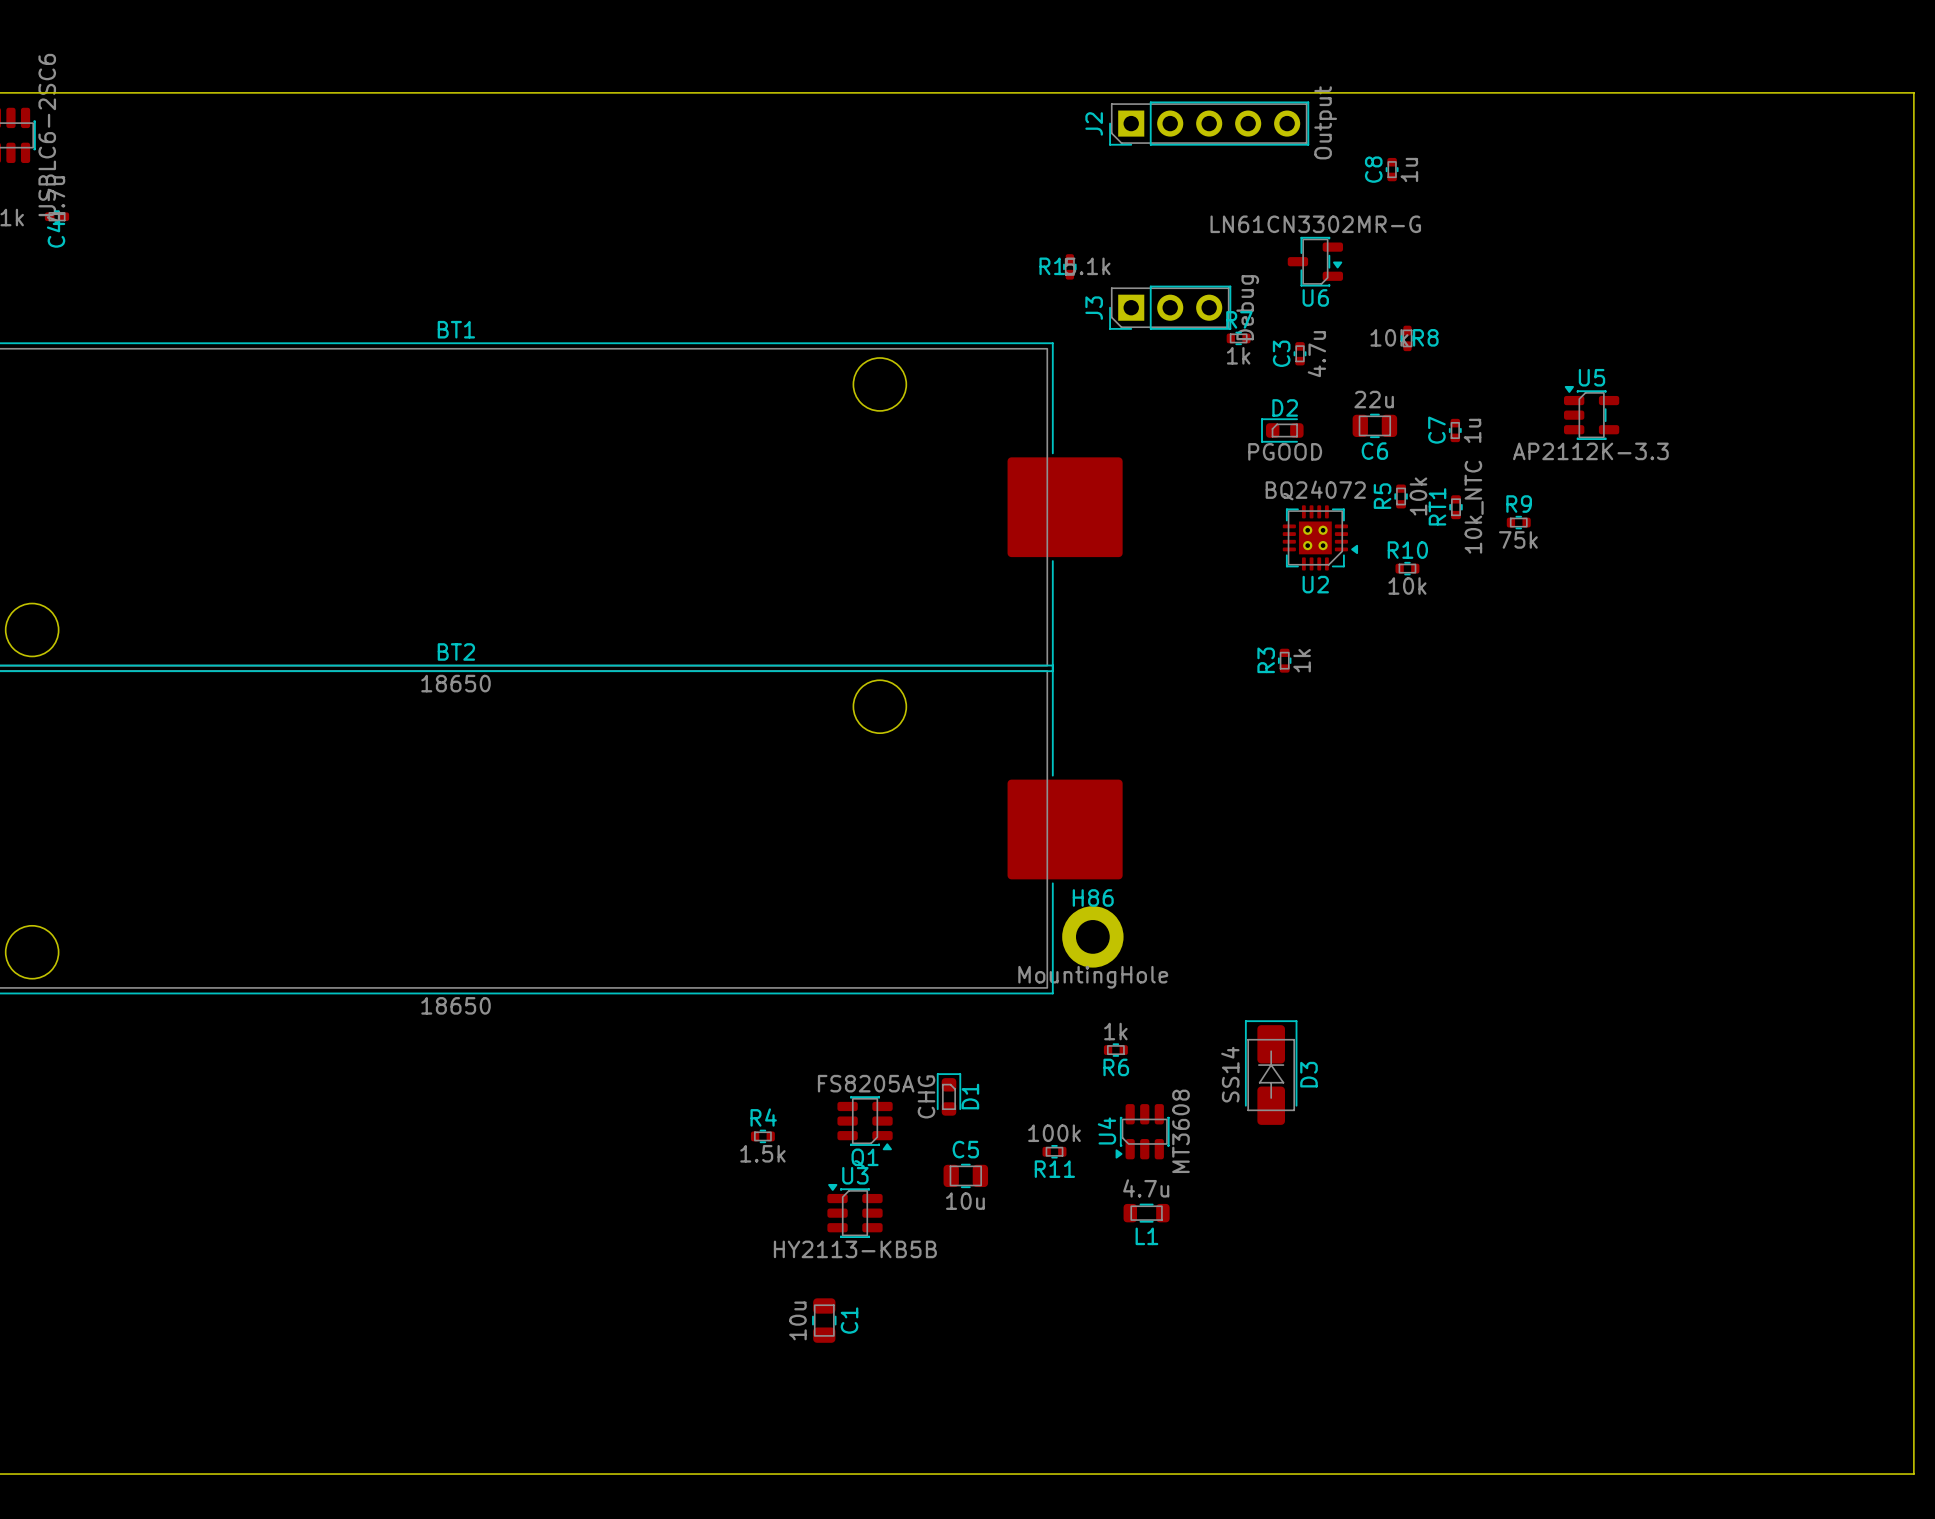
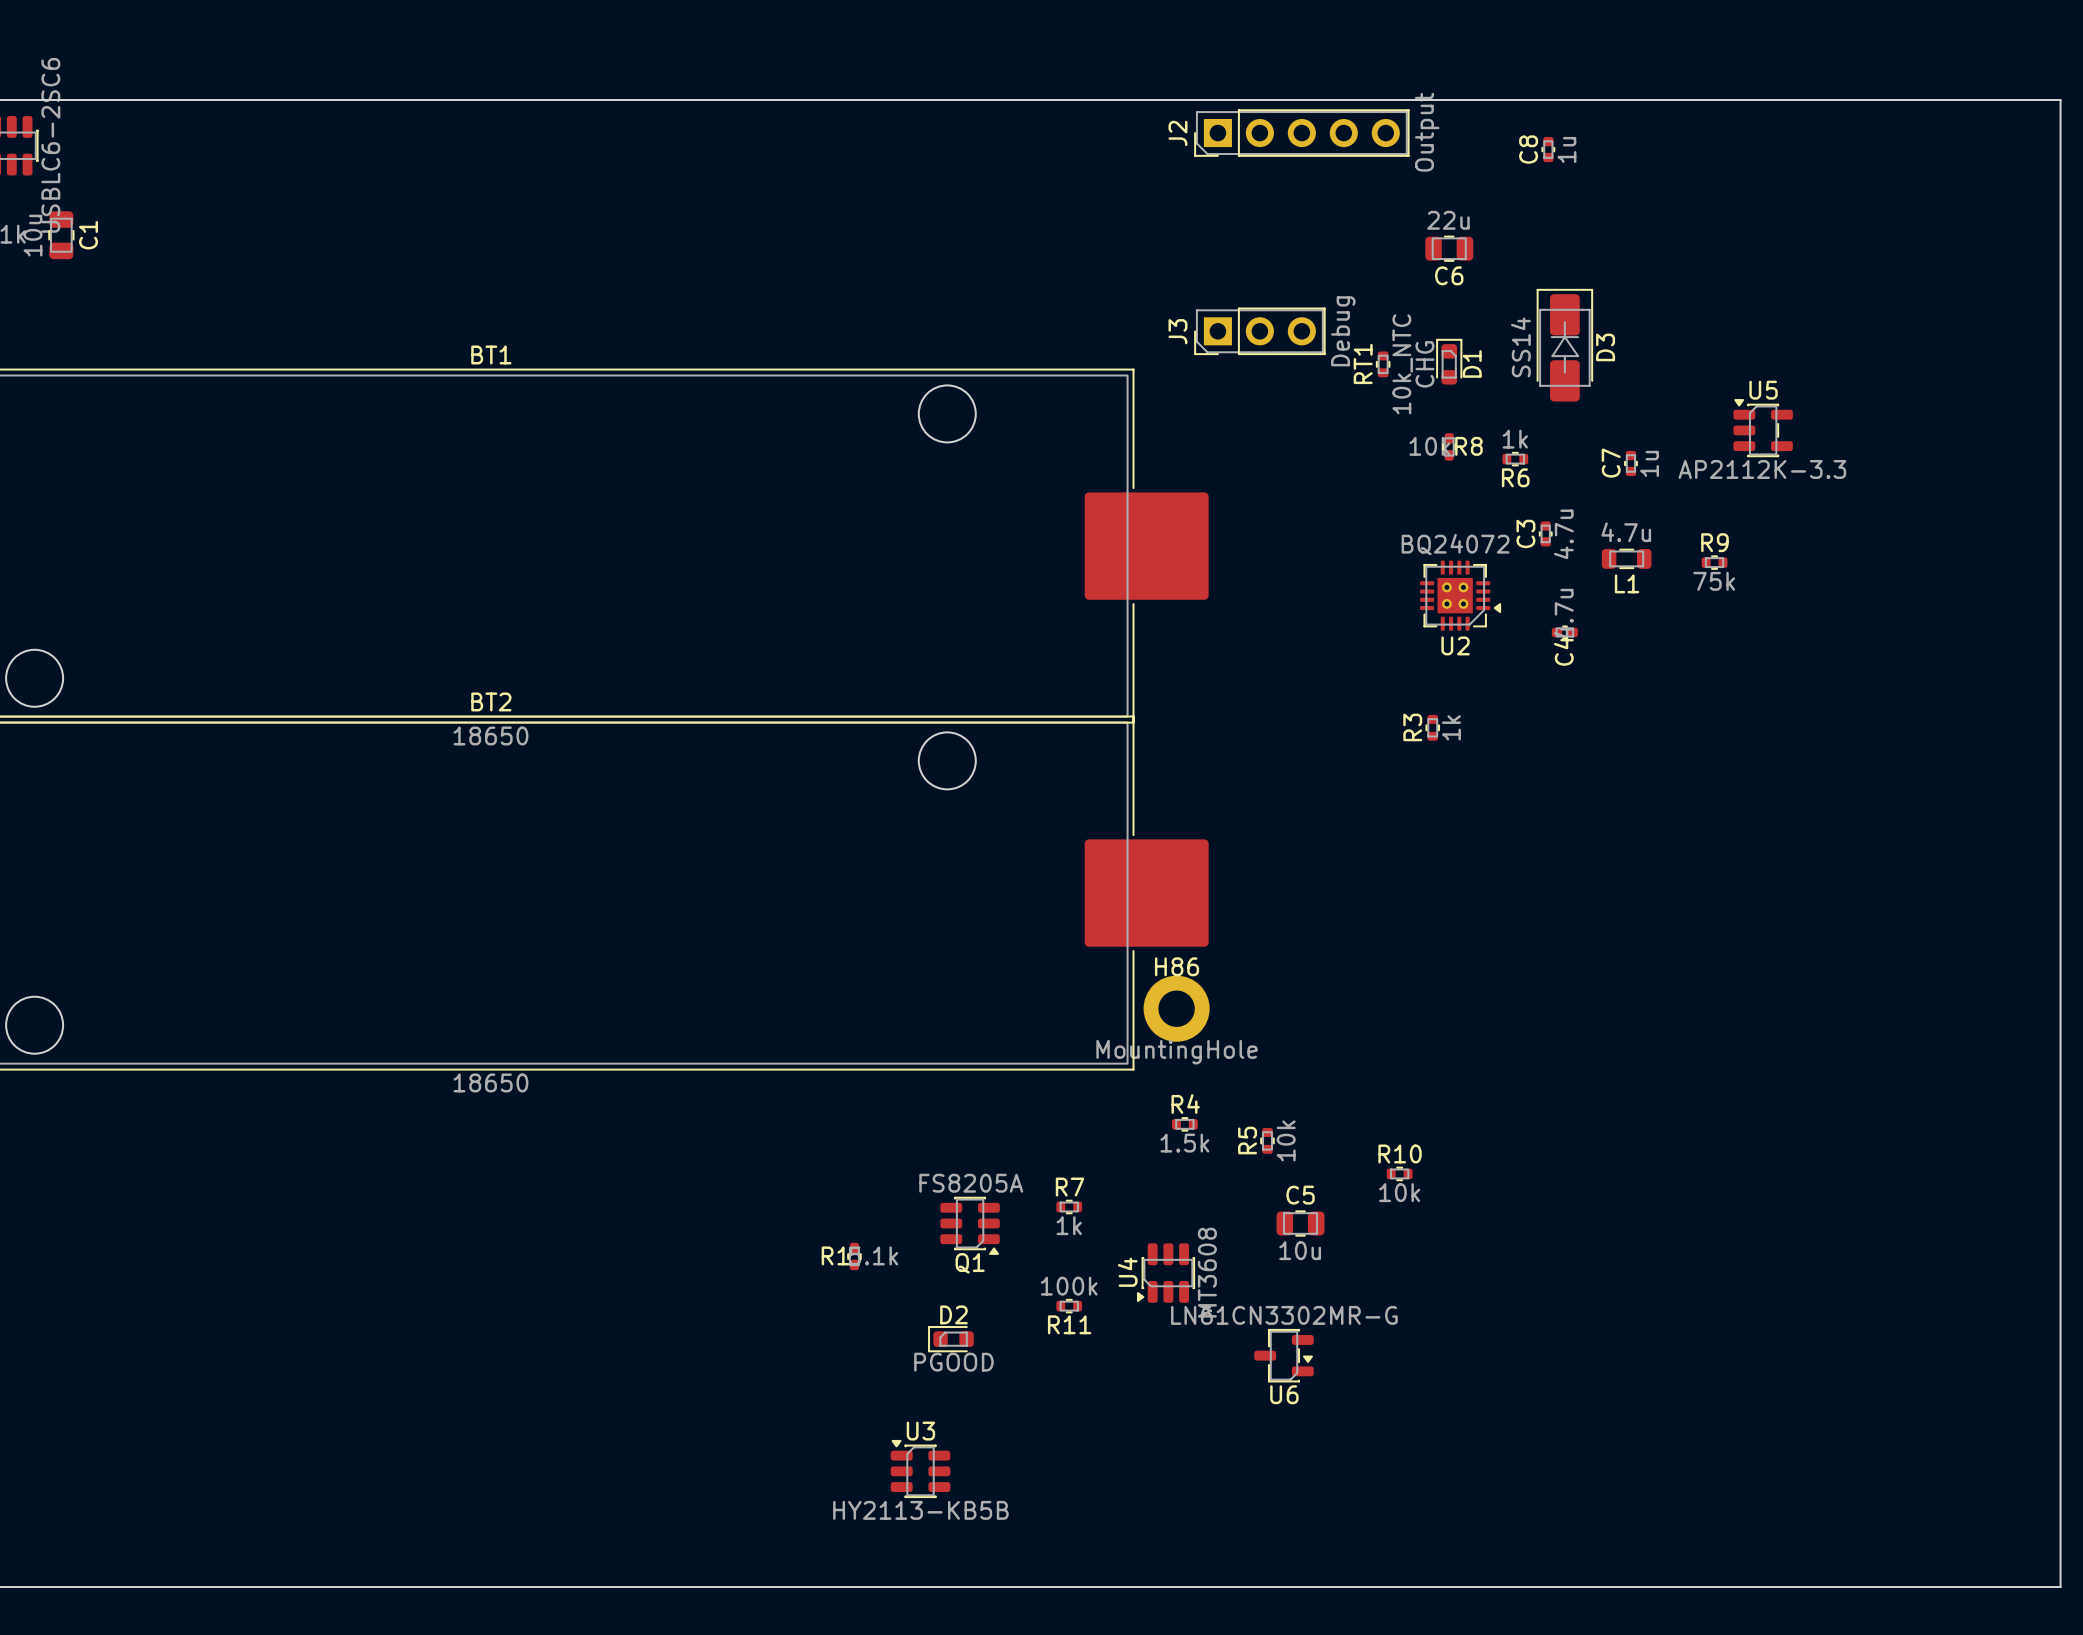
C8 position: (1392, 169) -> (1548, 149)
C4 position: (57, 216) -> (1564, 632)
U6 position: (1315, 261) -> (1284, 1355)
R1 position: (1069, 266) -> (854, 1256)
R7 position: (1238, 338) -> (1069, 1206)
R8 position: (1407, 338) -> (1449, 446)
C3 position: (1300, 353) -> (1545, 533)
U5 position: (1591, 412) -> (1763, 428)
C6 position: (1374, 425) -> (1449, 248)
D2 position: (1282, 430) -> (950, 1339)
C7 position: (1455, 430) -> (1630, 463)
R5 position: (1401, 496) -> (1267, 1140)
RT1 position: (1456, 507) -> (1383, 364)
R9 position: (1518, 522) -> (1714, 562)
U2 position: (1320, 537) -> (1460, 595)
R10 position: (1407, 568) -> (1399, 1173)
R3 position: (1284, 660) -> (1432, 727)
R6 position: (1115, 1050) -> (1515, 459)
D3 position: (1271, 1072) -> (1564, 345)
D1 position: (949, 1094) -> (1449, 361)
Q1 position: (865, 1123) -> (970, 1225)
U4 position: (1142, 1131) -> (1166, 1273)
R4 position: (762, 1136) -> (1184, 1124)
R11 position: (1054, 1151) -> (1069, 1306)
C5 position: (965, 1175) -> (1300, 1223)
U3 position: (855, 1210) -> (920, 1469)
L1 position: (1146, 1213) -> (1626, 558)
C1 position: (824, 1320) -> (61, 235)

